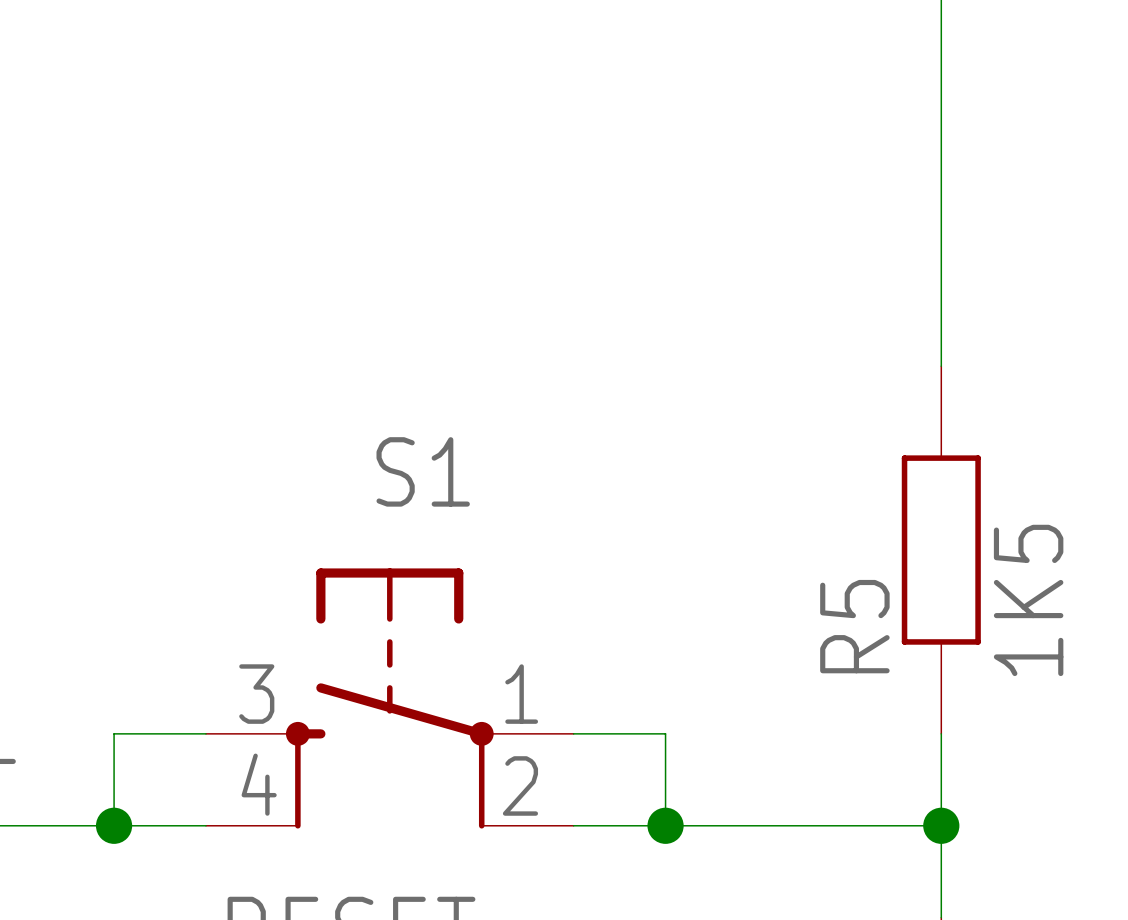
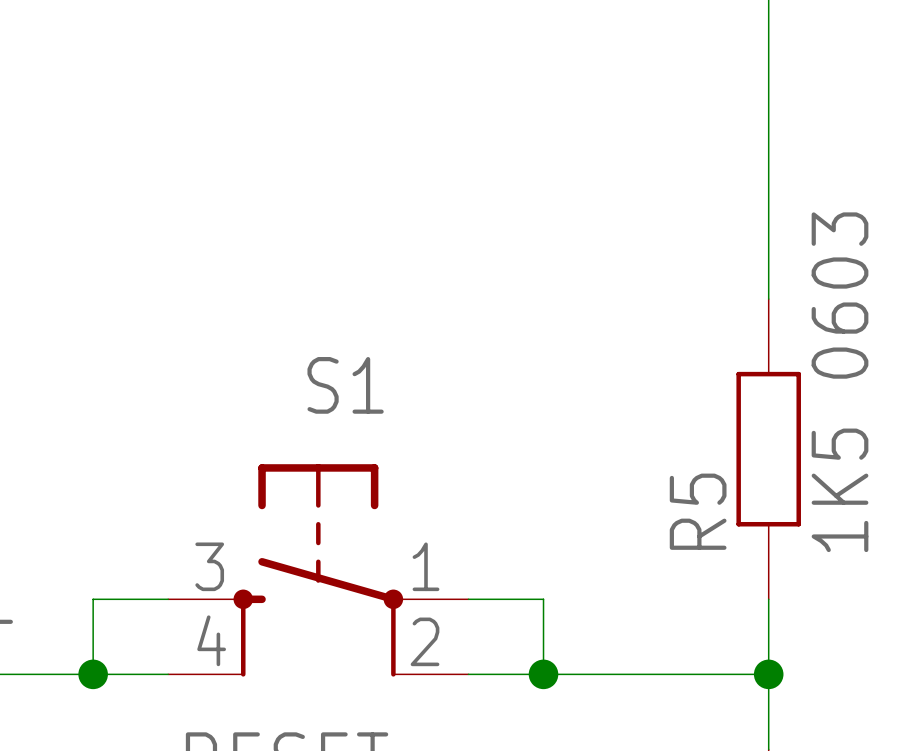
R5 value: 1K5 (1028, 600) -> 1K5 0603 (840, 382)

